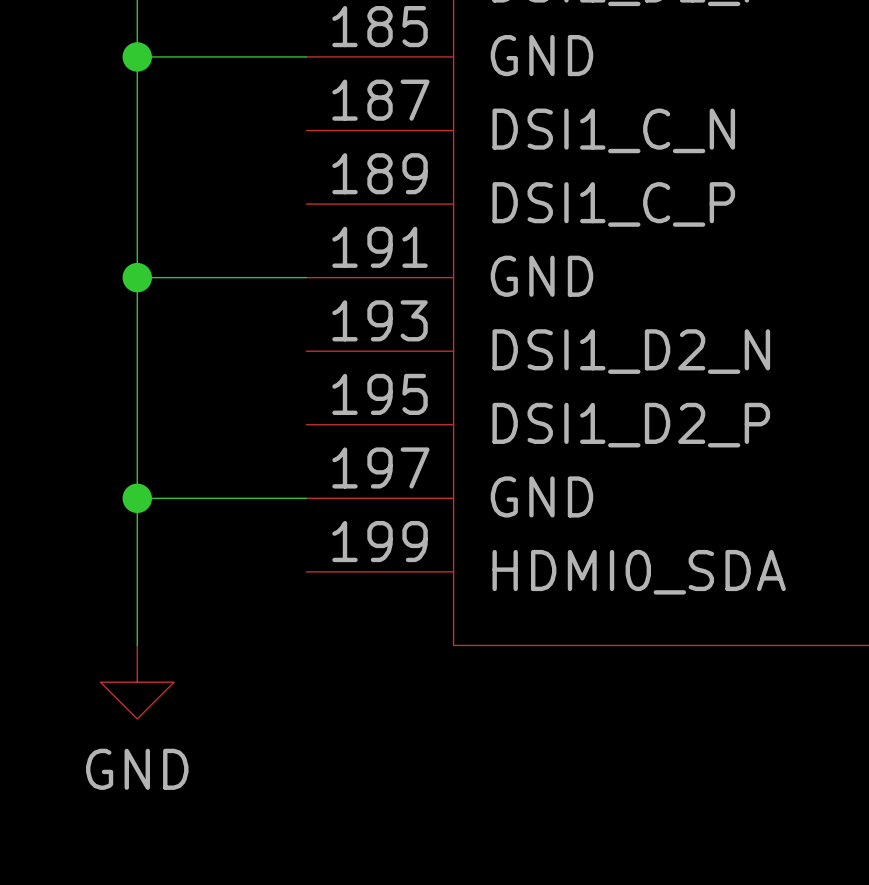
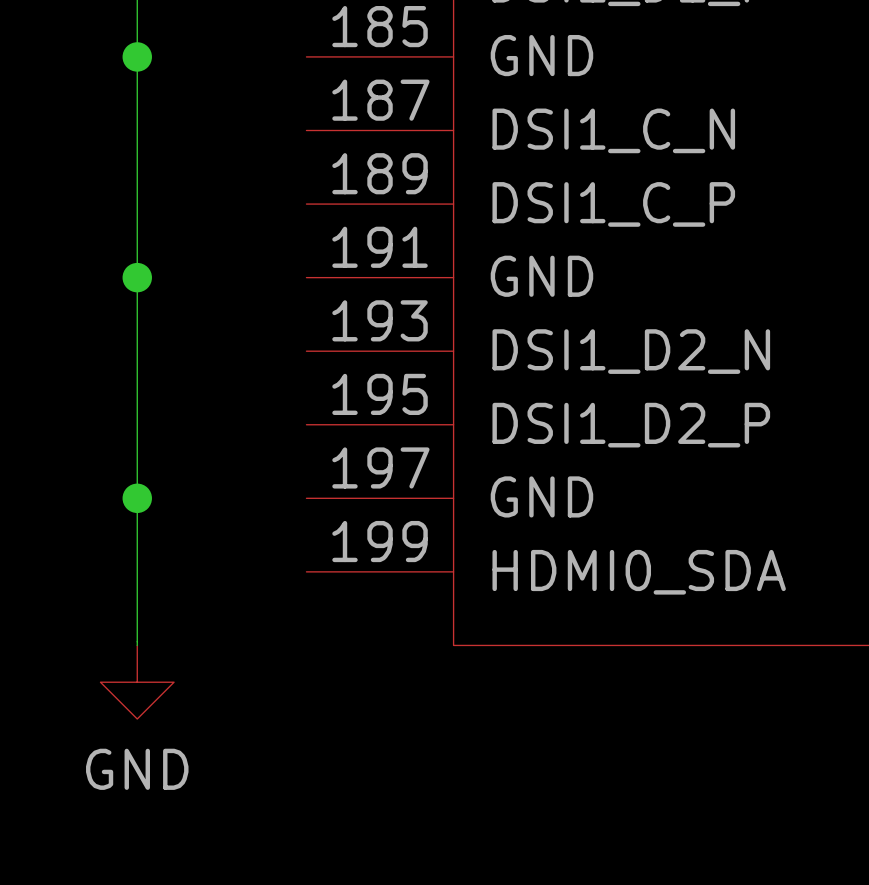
wire: (137, 56) (306, 56) -> none
wire: (137, 277) (306, 277) -> none
wire: (137, 498) (306, 498) -> none

